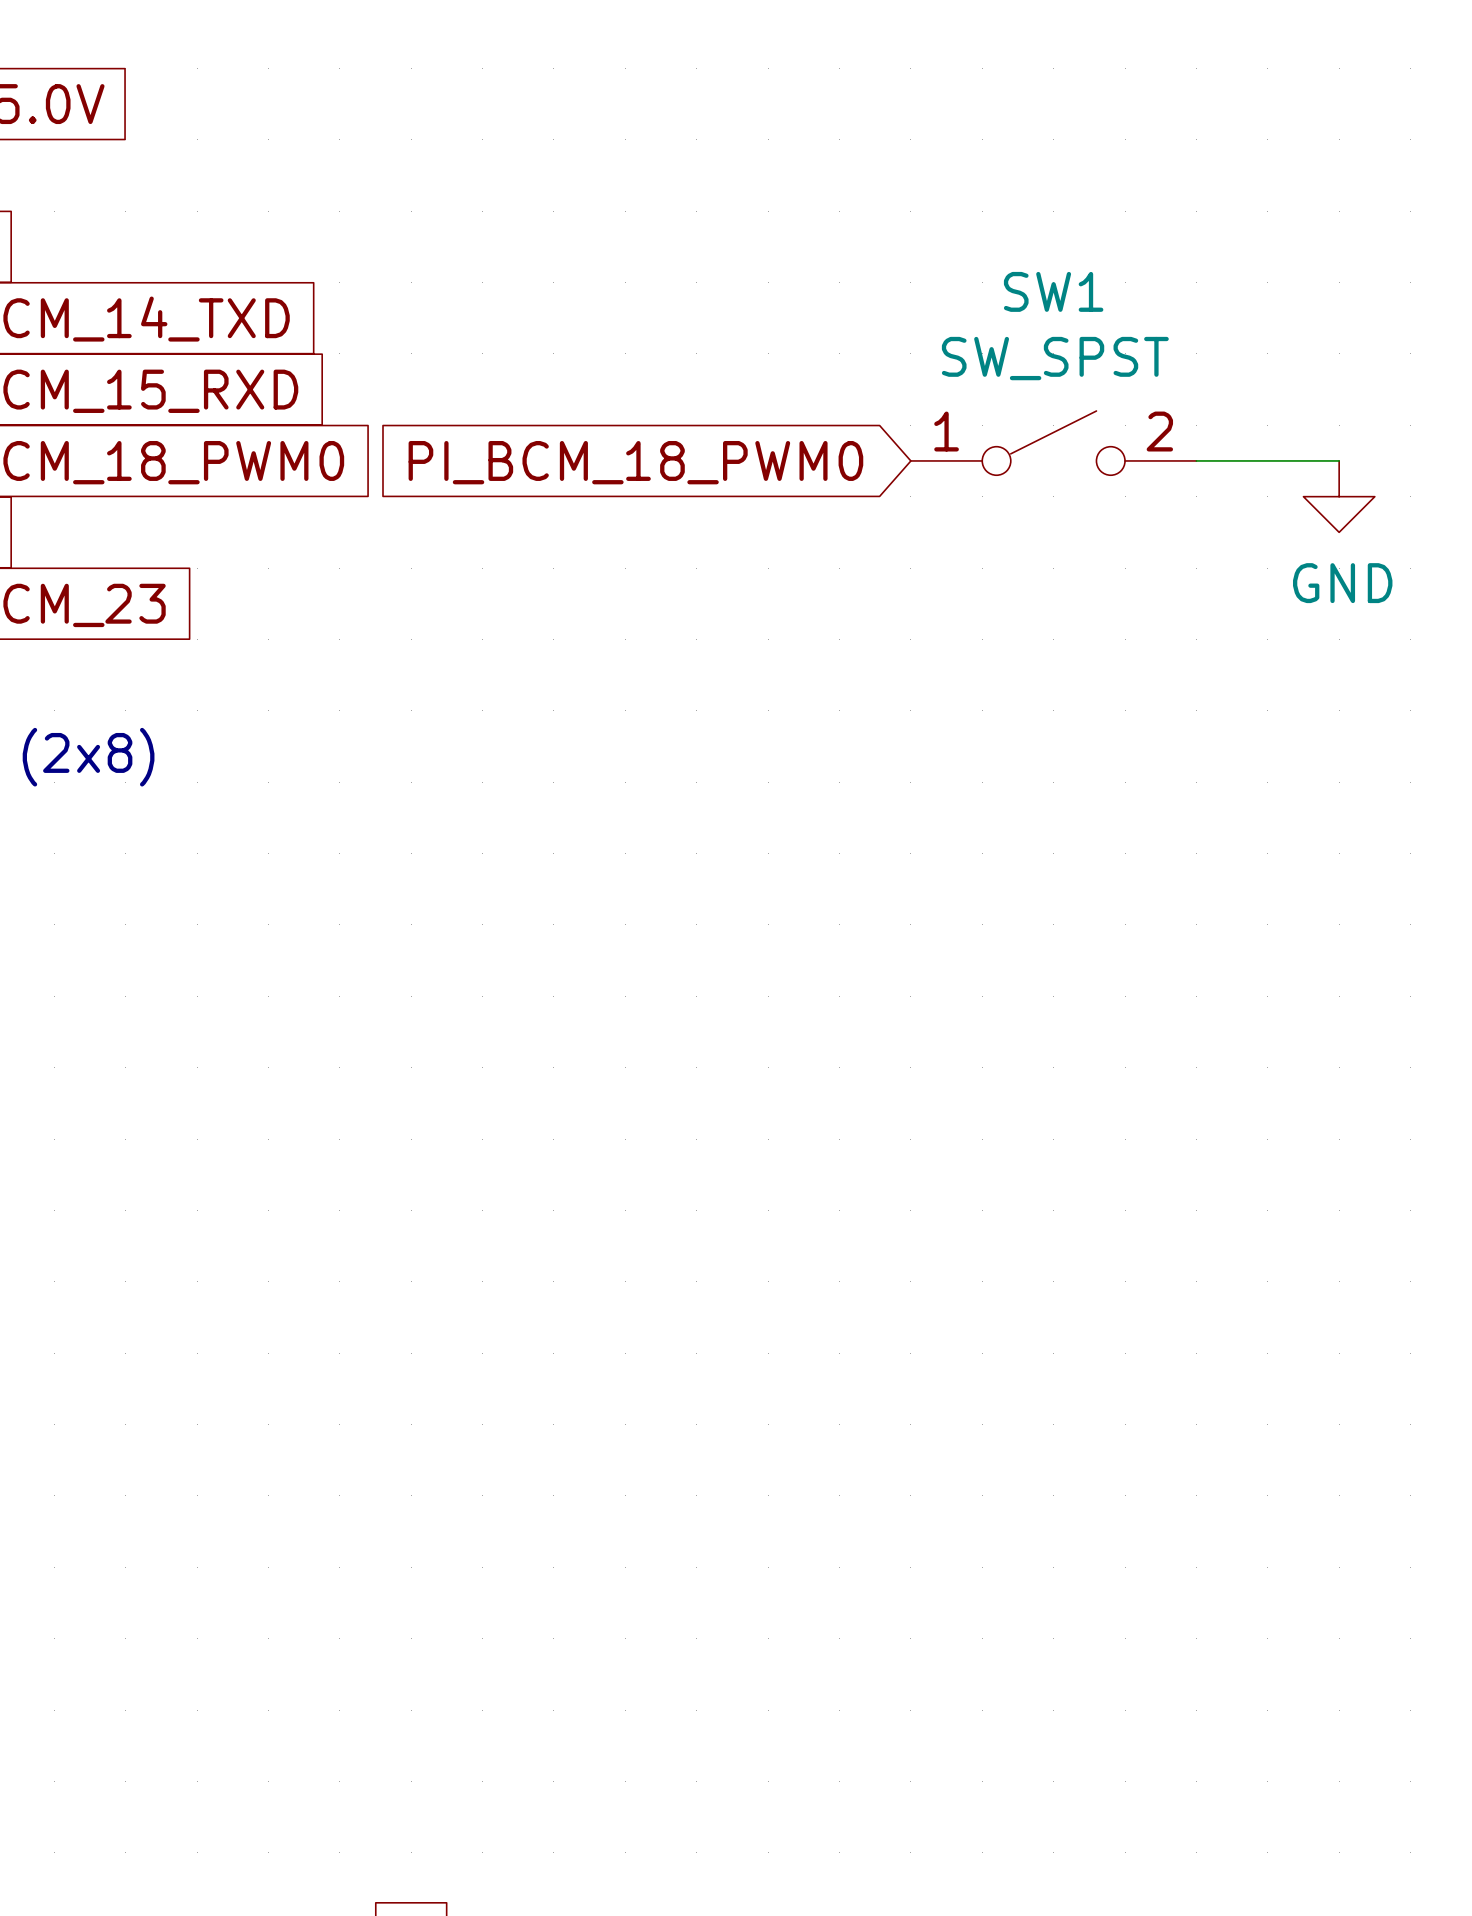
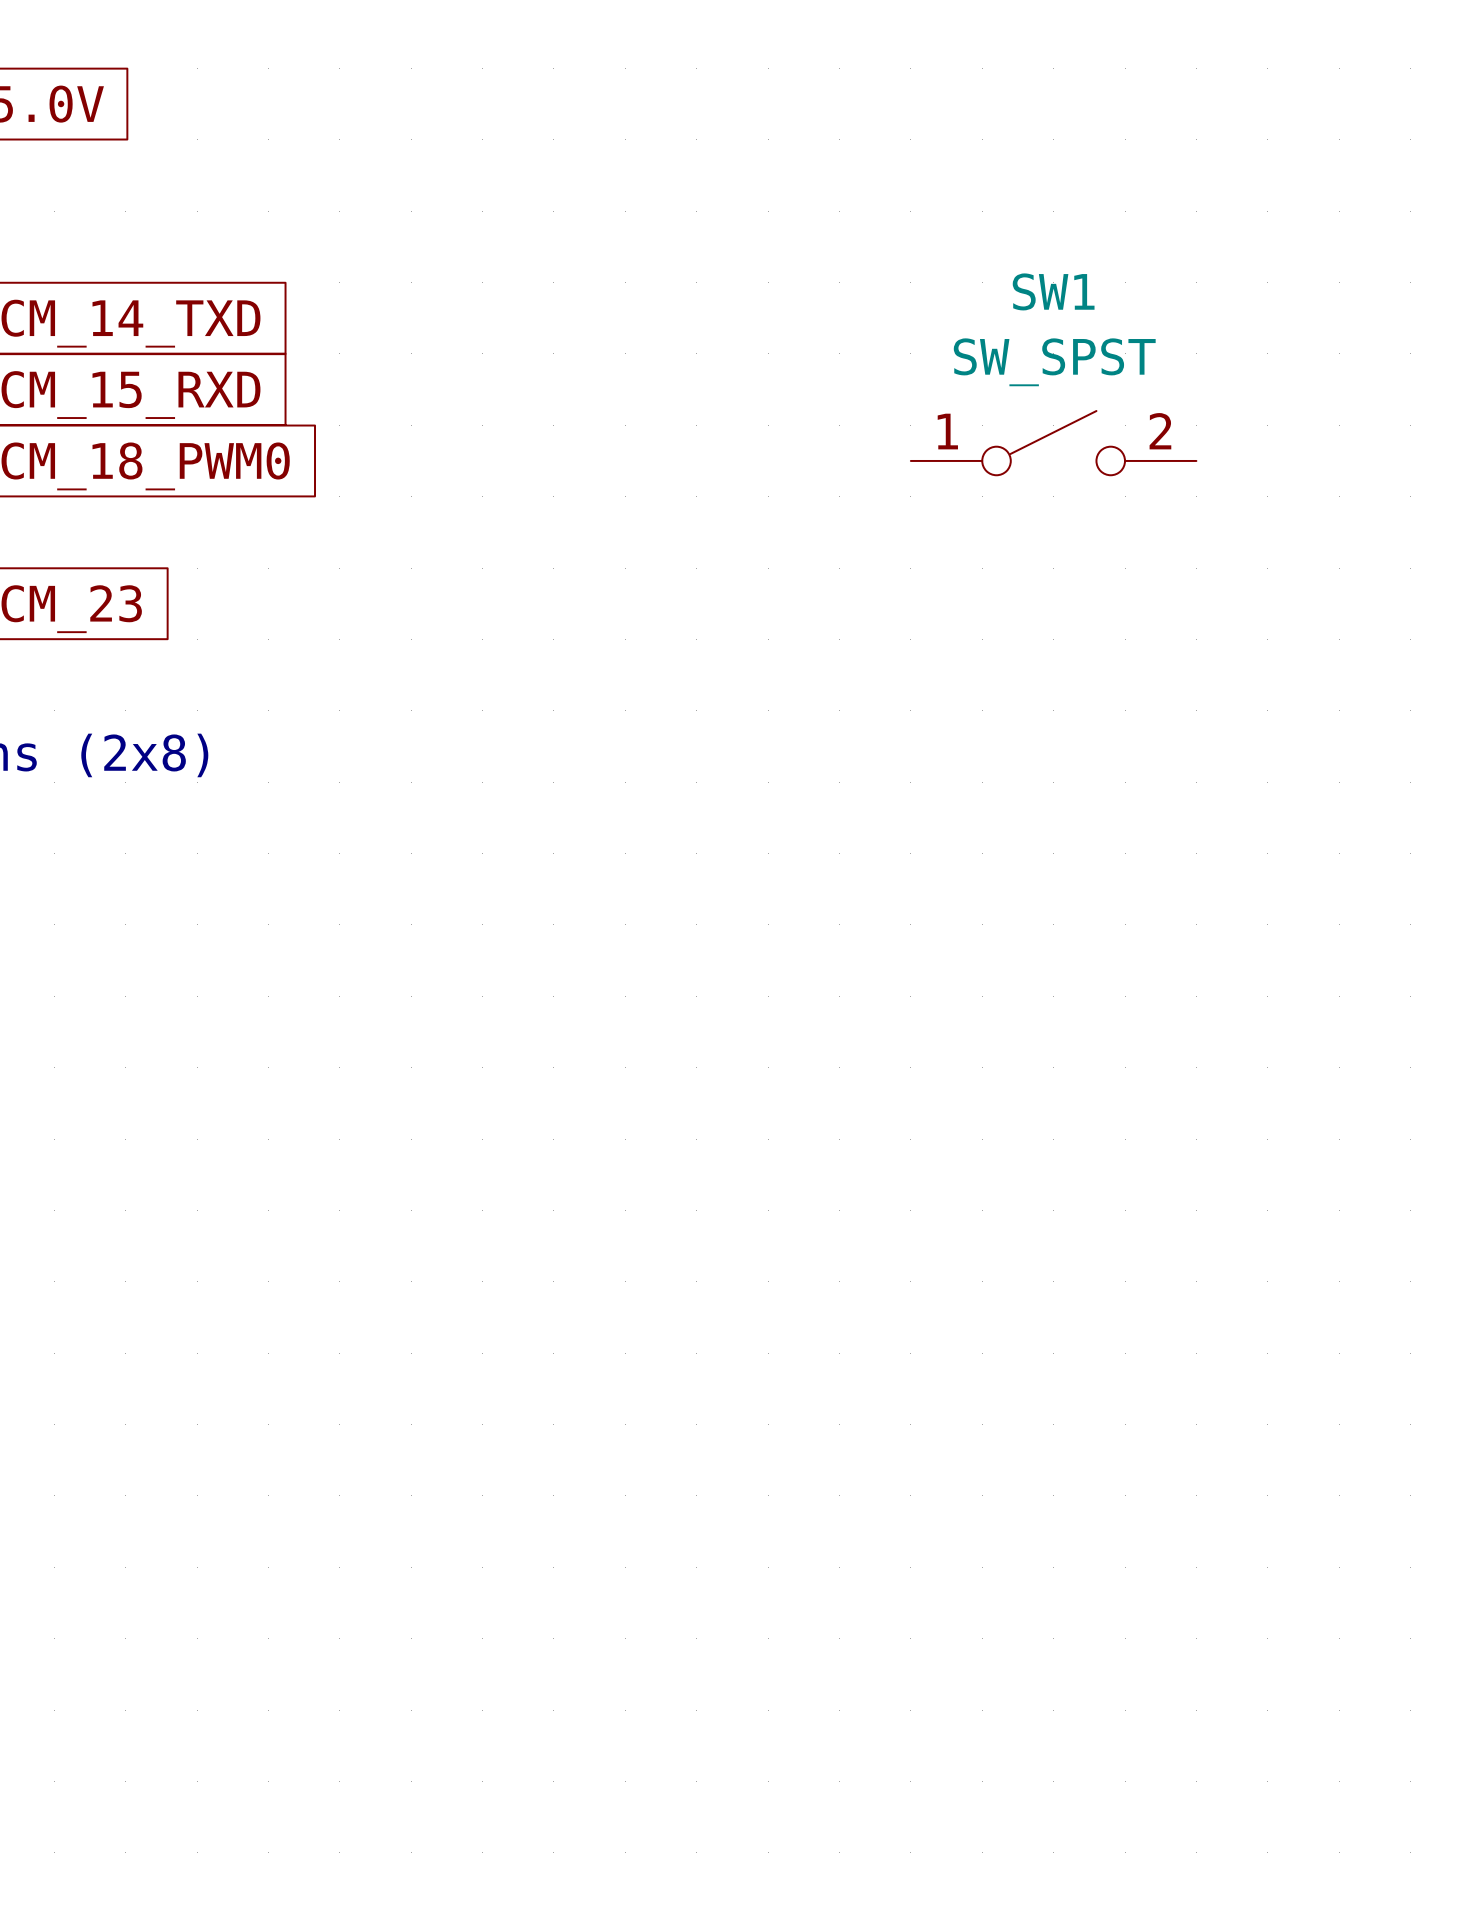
wire: (1196, 460) (1339, 460) -> none
global label: PI_BCM_18_PWM0 (635, 462) -> none
power symbol: GND (1339, 496) -> none

